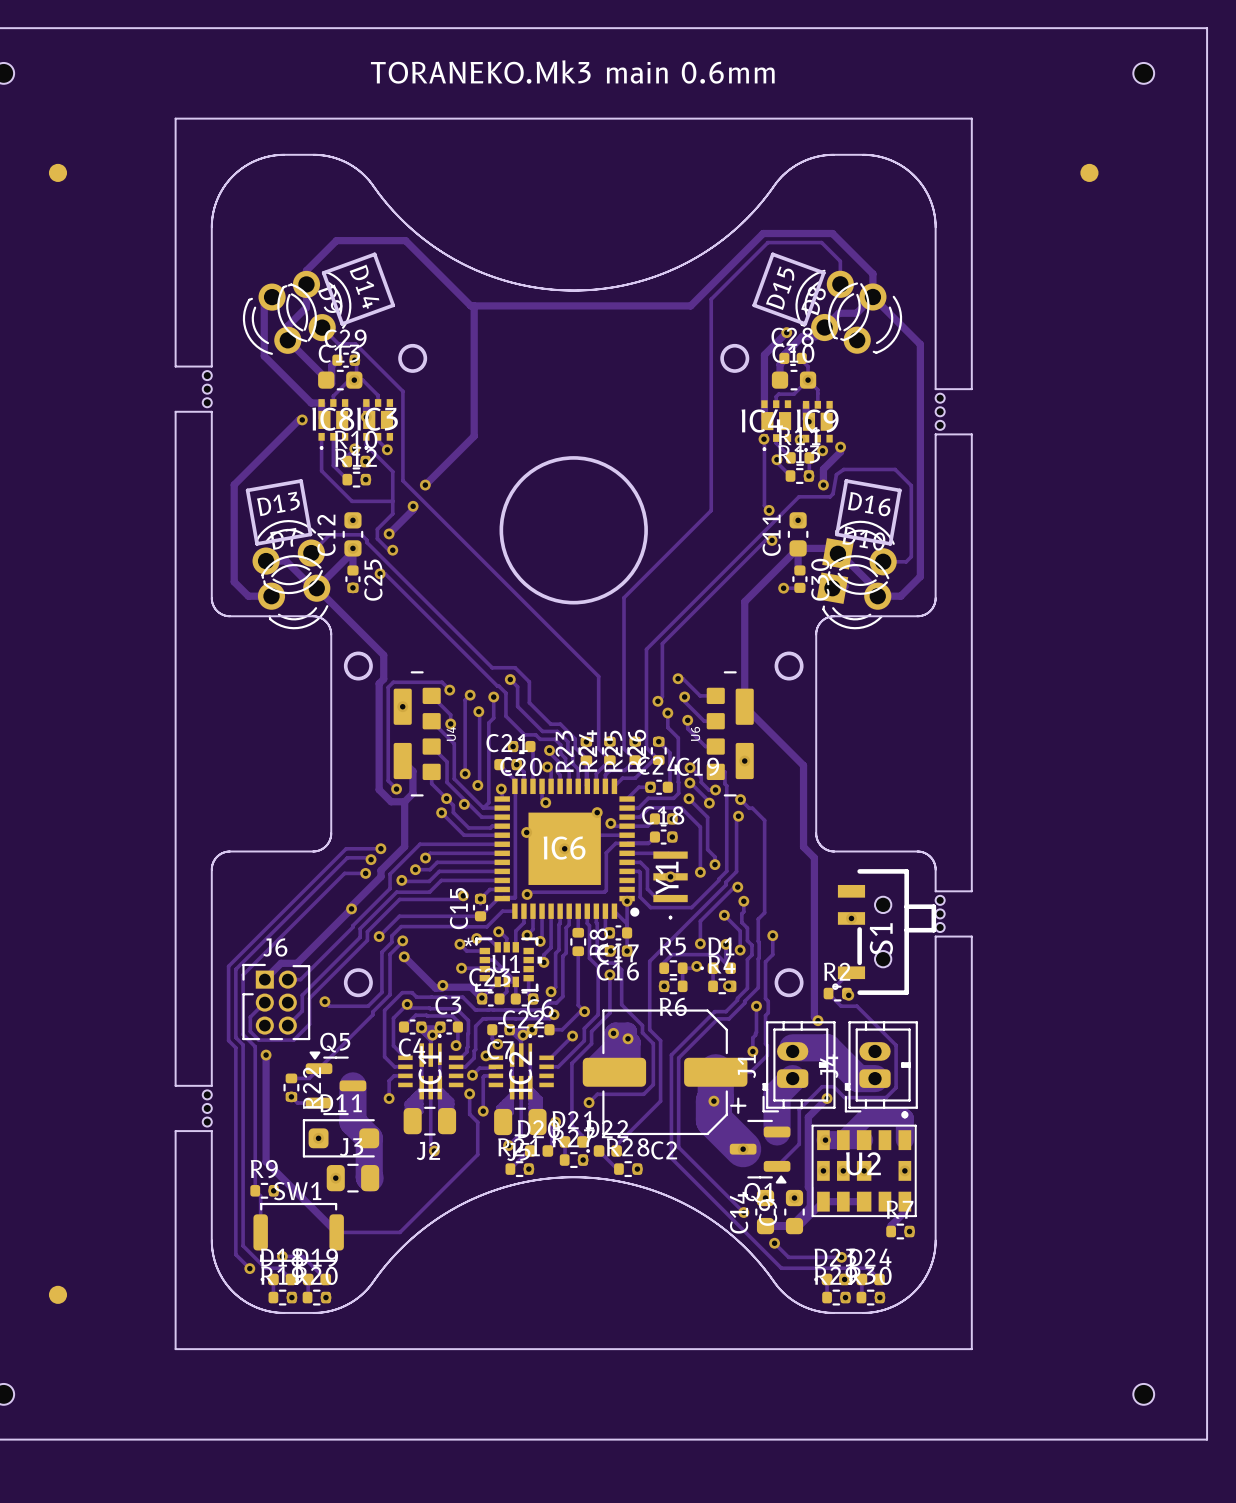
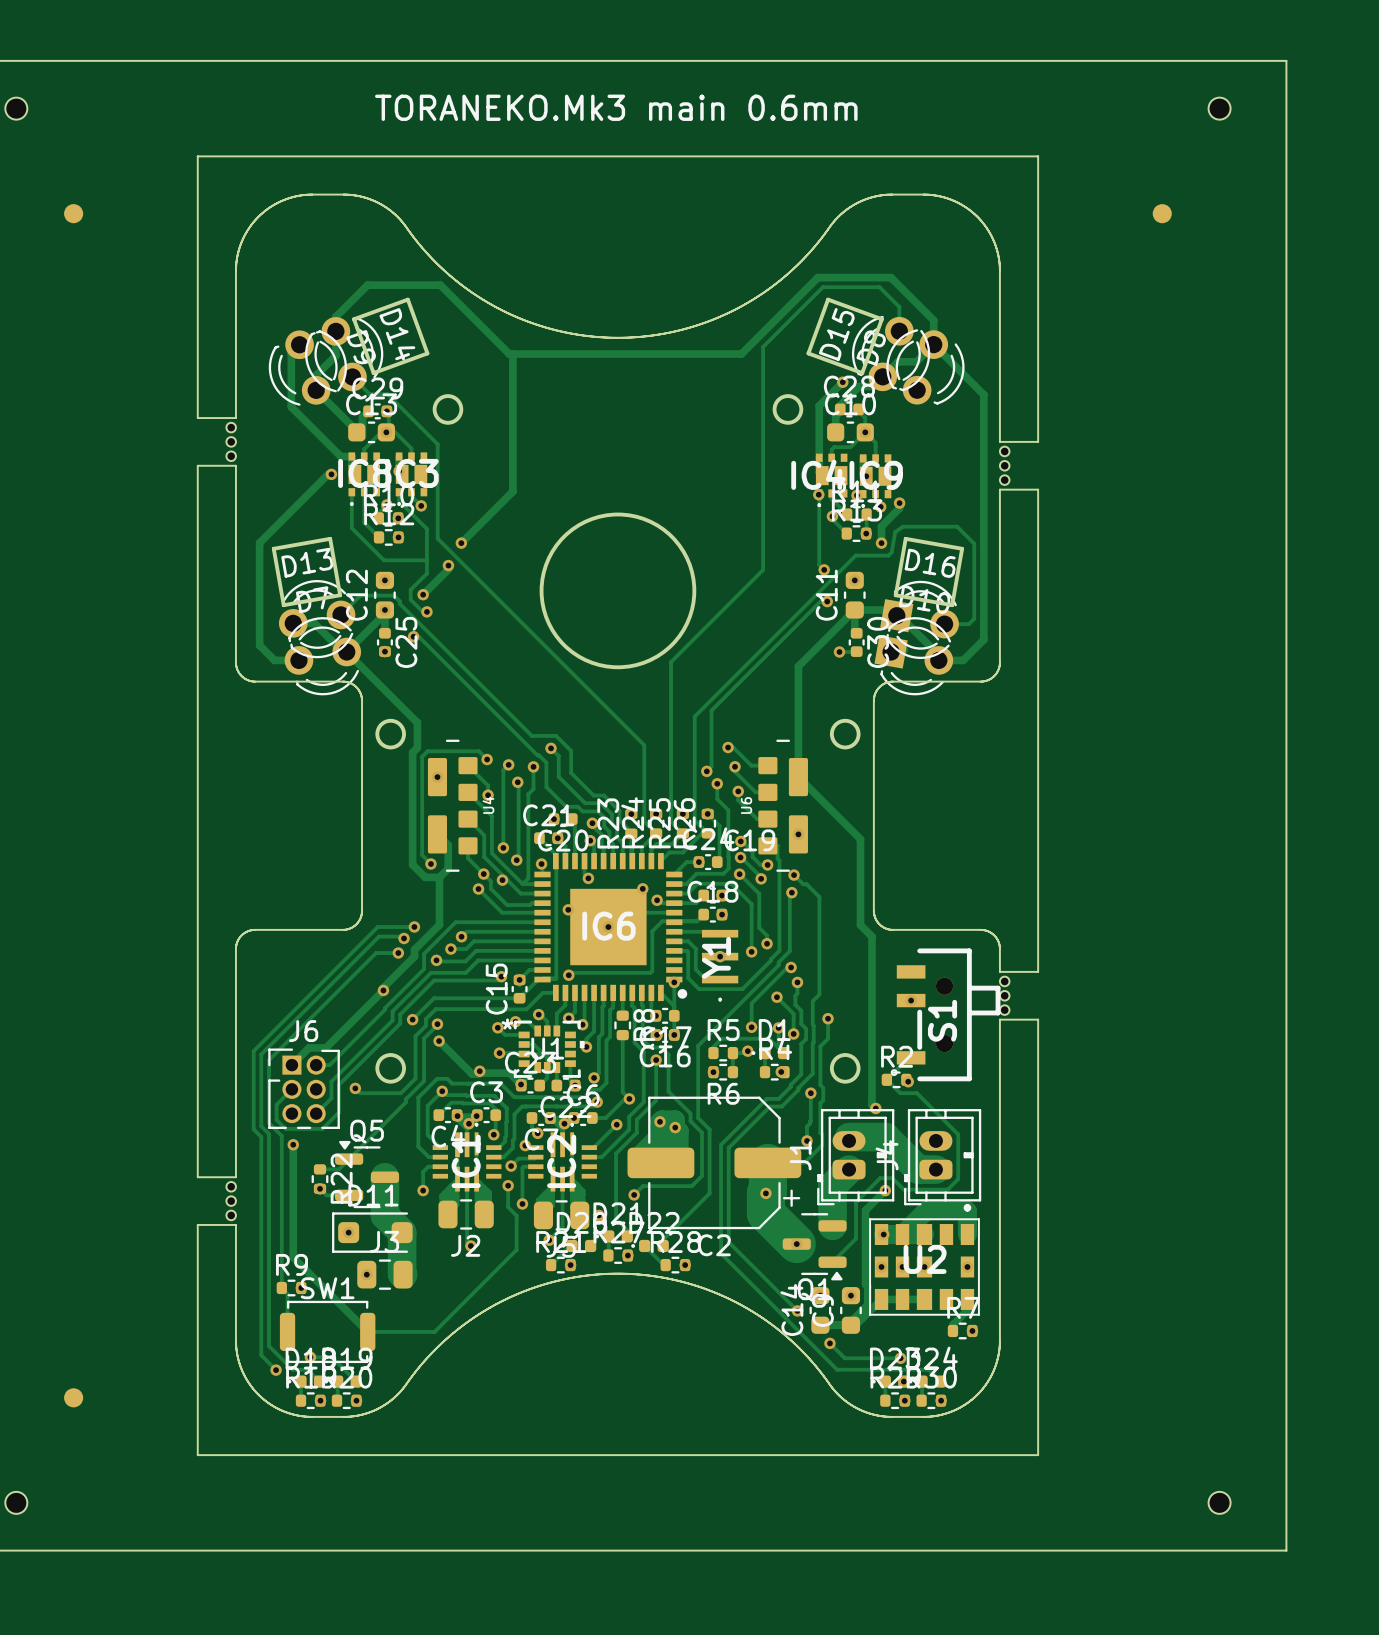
S1 footprint: [832, 869, 937, 995] -> [890, 948, 1001, 1082]

